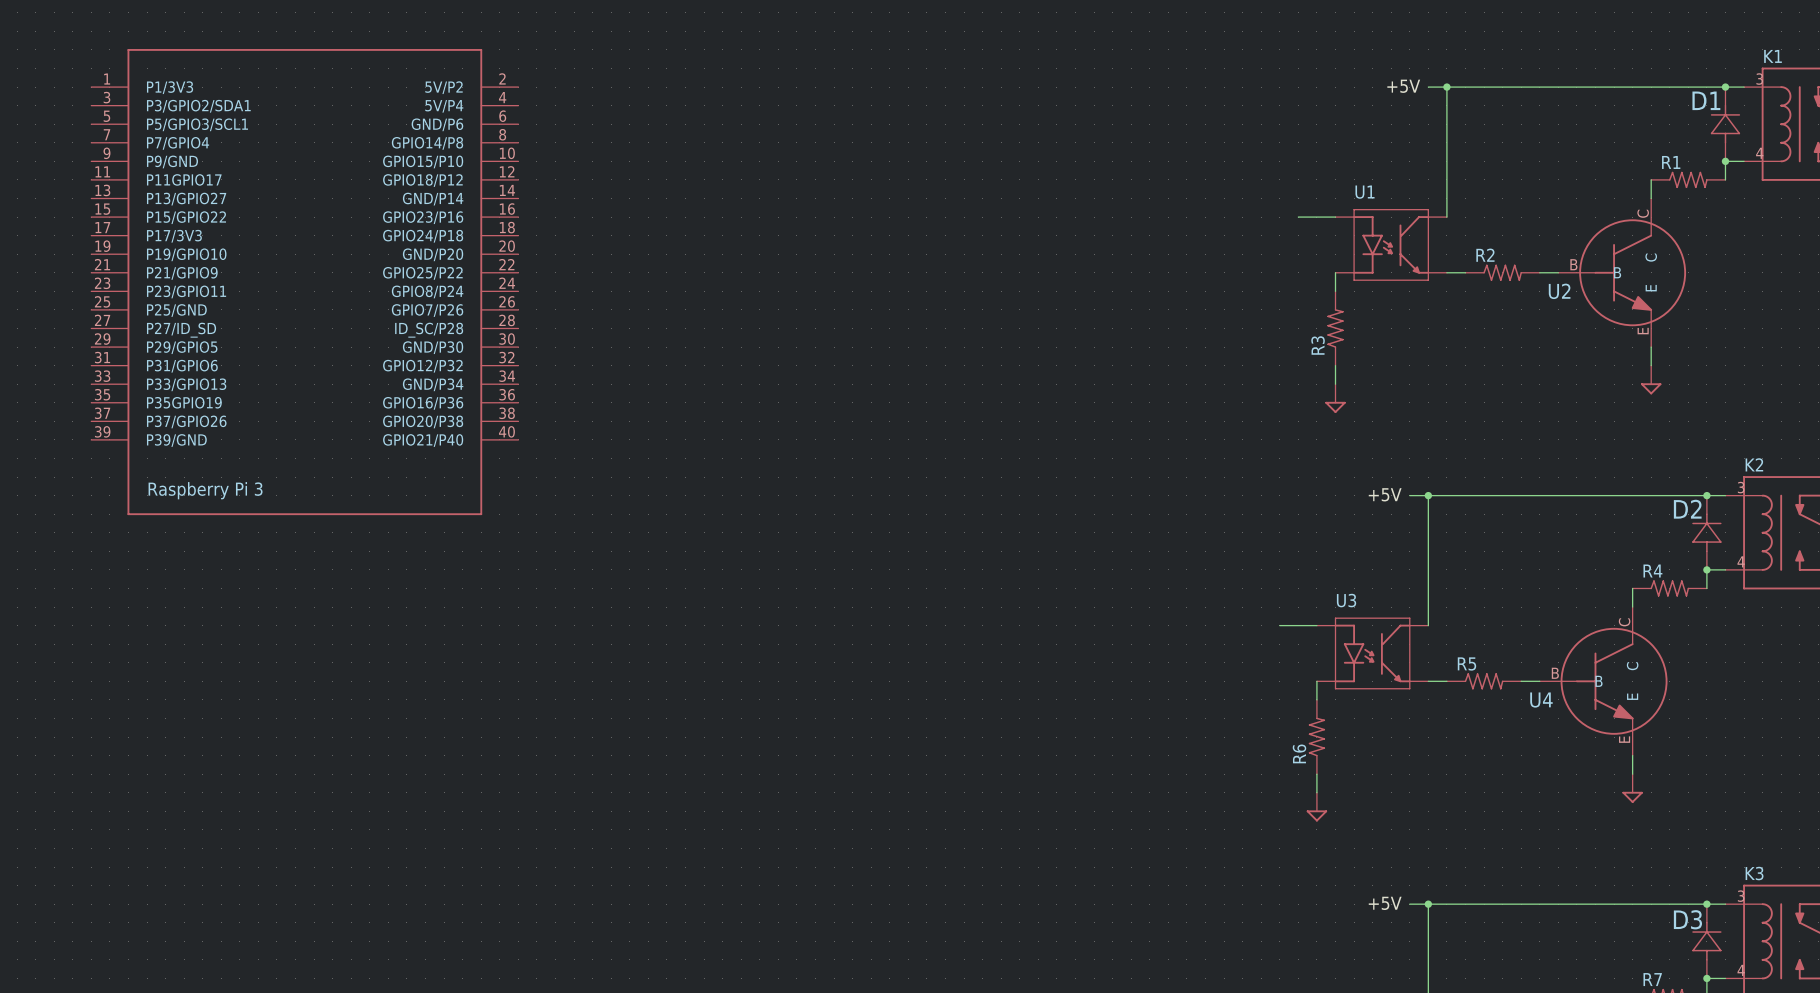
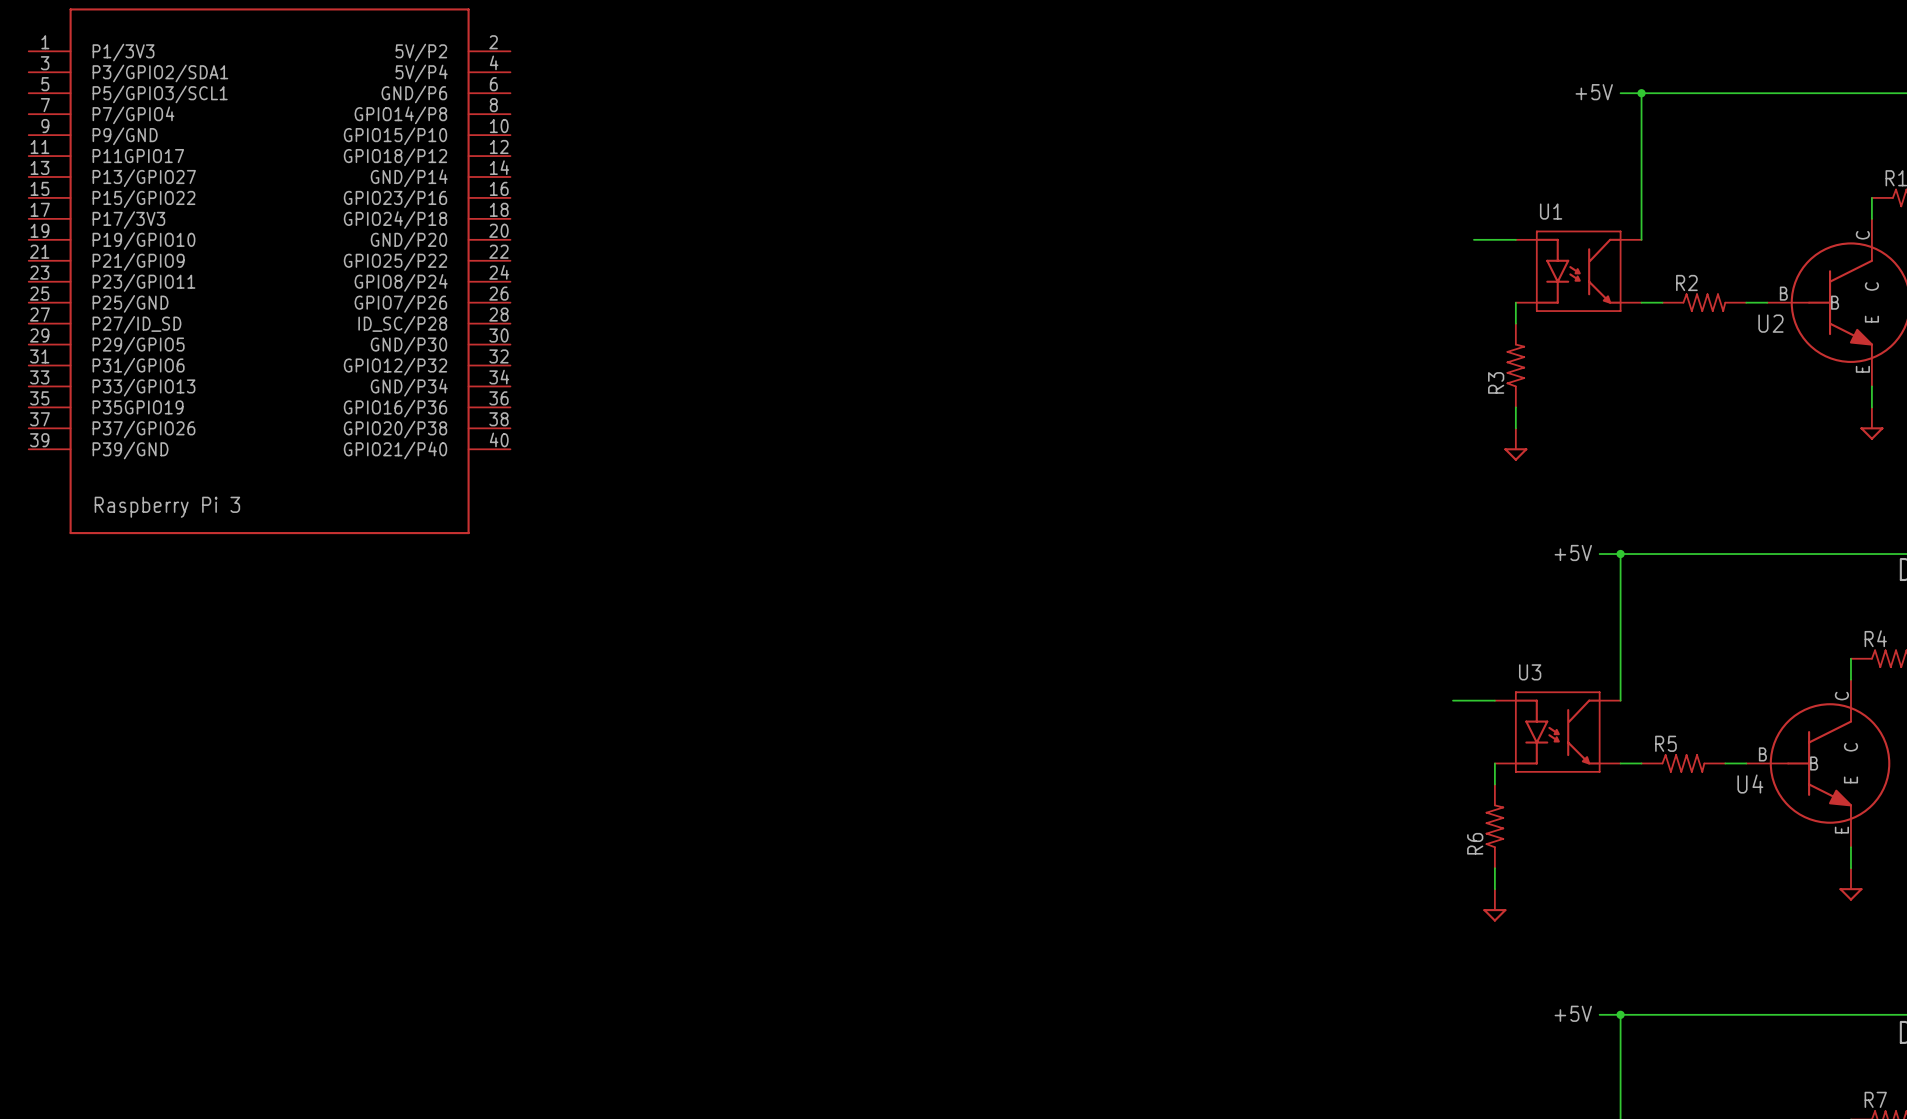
part position: (304, 282) -> (269, 271)

